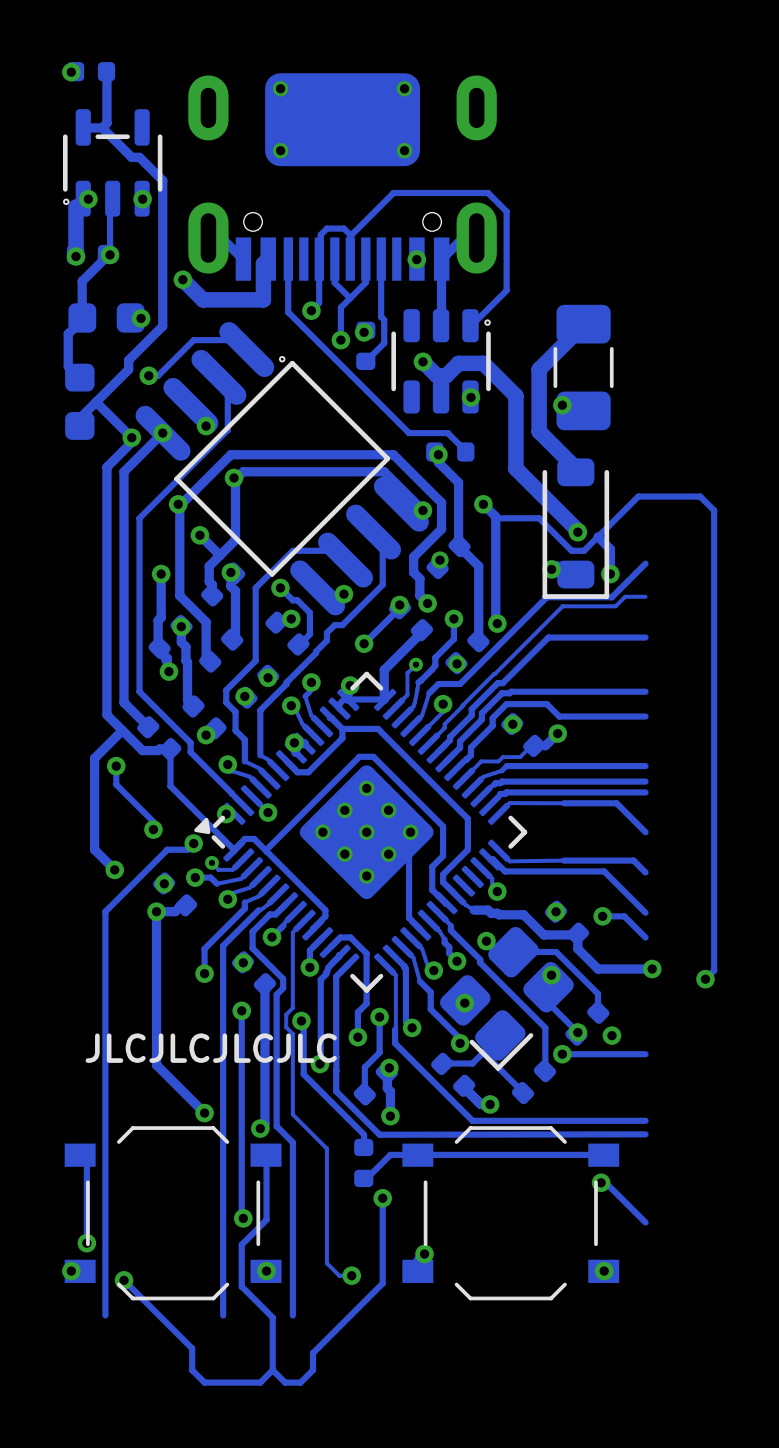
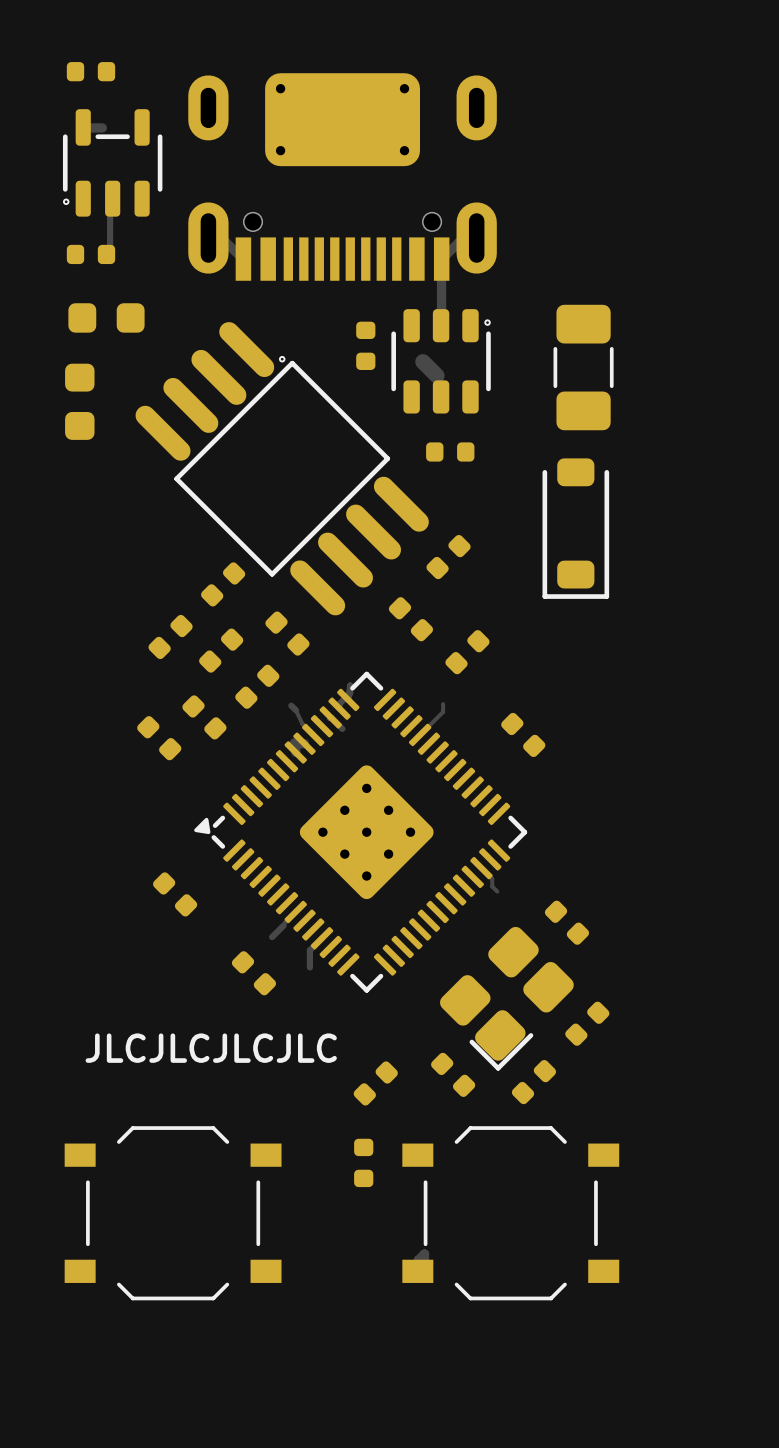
via: (71, 72) -> none
track: (106, 72) (106, 123) (102, 127) (131, 157) (139, 157) (162, 180) (162, 326) (128, 360) (128, 369) (79, 419) (79, 425) -> none
track: (88, 199) (83, 199) (76, 206) (76, 254) -> none
via: (88, 199) -> none
via: (142, 199) -> none
track: (350, 234) (393, 192) (488, 192) (506, 211) (506, 290) (470, 326) -> none
track: (350, 234) (343, 228) (326, 228) (320, 234) (319, 302) (311, 310) -> none
track: (106, 254) (106, 256) (82, 281) (82, 319) (68, 333) (68, 366) (79, 377) -> none
via: (110, 254) -> none
via: (76, 256) -> none
track: (268, 259) (263, 263) (263, 299) (203, 299) (182, 279) -> none
track: (288, 259) (288, 312) (409, 433) (447, 433) (466, 451) -> none
track: (334, 259) (334, 282) (350, 298) -> none
track: (365, 259) (365, 282) (340, 307) (340, 340) -> none
track: (381, 259) (381, 316) (384, 319) (384, 343) (365, 361) -> none
via: (416, 259) -> none
via: (182, 279) -> none
via: (311, 310) -> none
via: (141, 318) -> none
track: (584, 324) (539, 369) (539, 431) (576, 468) (576, 471) -> none
via: (364, 332) -> none
via: (340, 340) -> none
track: (246, 349) (237, 340) (193, 340) (157, 375) -> none
via: (422, 361) -> none
via: (148, 375) -> none
track: (218, 377) (227, 386) (227, 429) (139, 518) (139, 691) (190, 742) (190, 752) (232, 793) -> none
track: (441, 397) (436, 392) (436, 375) (446, 375) (458, 363) (483, 363) (515, 395) (515, 468) (577, 530) -> none
via: (470, 397) -> none
track: (96, 402) (131, 437) (131, 442) (106, 467) (106, 714) (142, 750) (170, 749) (170, 786) (234, 849) -> none
via: (562, 405) -> none
via: (206, 426) -> none
track: (162, 433) (124, 471) (124, 702) (148, 727) -> none
via: (162, 433) -> none
via: (131, 437) -> none
track: (434, 452) (438, 454) (438, 462) (458, 482) (458, 544) (460, 546) -> none
via: (438, 454) -> none
via: (234, 477) -> none
track: (235, 479) (243, 471) (384, 471) (422, 510) -> none
track: (235, 479) (235, 539) (209, 566) (209, 581) (212, 584) (212, 595) -> none
via: (178, 504) -> none
track: (179, 504) (179, 595) (206, 622) (206, 657) (210, 661) -> none
track: (181, 504) (230, 454) (393, 454) (441, 502) (441, 529) (413, 556) (413, 572) (419, 578) (419, 595) (427, 603) -> none
track: (483, 504) (495, 516) (495, 622) -> none
via: (483, 504) -> none
via: (422, 510) -> none
track: (495, 518) (539, 518) (571, 550) (584, 550) (638, 496) (700, 496) (714, 510) (714, 970) (705, 979) -> none
track: (373, 532) (382, 541) (382, 584) (342, 625) (334, 625) (326, 632) (326, 640) (260, 710) (260, 755) (278, 770) -> none
via: (577, 532) -> none
track: (199, 535) (220, 555) -> none
via: (199, 535) -> none
track: (598, 536) (610, 549) (610, 574) -> none
track: (460, 546) (478, 566) (478, 641) -> none
track: (345, 560) (336, 550) (292, 550) (255, 587) (255, 660) (226, 690) (226, 702) (235, 711) (235, 730) (244, 739) (244, 761) (258, 768) (269, 778) -> none
via: (440, 560) -> none
track: (645, 563) (611, 597) (546, 597) (460, 684) (438, 684) (429, 693) (422, 715) (411, 726) -> none
via: (551, 569) -> none
track: (230, 572) (230, 586) (235, 591) (235, 635) (232, 639) -> none
via: (230, 572) -> none
track: (161, 574) (161, 617) (158, 620) (158, 646) (159, 648) (168, 657) (168, 671) (159, 647) -> none
via: (161, 574) -> none
via: (610, 574) -> none
track: (280, 587) (309, 612) (309, 634) (298, 644) -> none
via: (280, 587) -> none
via: (343, 594) -> none
track: (645, 596) (625, 596) (615, 606) (562, 606) (462, 705) (428, 743) -> none
via: (427, 603) -> none
track: (399, 605) (399, 608) (364, 643) -> none
via: (399, 605) -> none
via: (291, 618) -> none
track: (453, 618) (453, 639) (435, 657) (435, 665) (418, 682) (413, 706) (402, 717) -> none
via: (453, 618) -> none
via: (497, 623) -> none
track: (181, 626) (181, 642) (185, 646) (187, 662) (187, 701) (193, 706) -> none
via: (181, 626) -> none
track: (421, 629) (421, 632) (384, 670) (384, 699) -> none
track: (645, 637) (548, 637) (502, 683) (497, 683) (471, 709) (471, 715) (437, 751) -> none
via: (364, 643) -> none
via: (457, 663) -> none
track: (416, 664) (407, 673) (407, 694) (393, 708) -> none
via: (416, 664) -> none
via: (168, 671) -> none
via: (268, 677) -> none
via: (311, 682) -> none
via: (350, 685) -> none
track: (309, 691) (305, 696) (311, 715) (322, 726) -> none
track: (645, 691) (501, 693) (481, 713) (481, 719) (460, 741) (460, 747) (446, 761) -> none
track: (347, 695) (348, 699) (385, 699) -> none
via: (244, 696) -> none
via: (443, 704) -> none
via: (291, 705) -> none
track: (645, 716) (559, 716) (546, 704) (506, 704) (492, 718) (492, 725) (470, 747) (470, 755) (455, 770) -> none
via: (512, 724) -> none
track: (122, 730) (94, 758) (94, 849) (114, 869) -> none
track: (557, 733) (545, 745) -> none
via: (557, 733) -> none
via: (206, 735) -> none
via: (294, 742) -> none
track: (534, 745) (531, 745) (520, 757) (502, 757) (498, 761) (481, 761) (463, 778) -> none
track: (286, 761) (297, 772) (308, 772) (342, 738) (342, 728) (378, 728) (467, 818) (467, 849) (443, 874) (443, 882) (455, 894) -> none
via: (227, 764) -> none
track: (116, 766) (116, 784) (153, 821) (153, 829) -> none
via: (116, 766) -> none
track: (645, 766) (506, 766) (501, 770) (483, 776) (472, 787) -> none
track: (230, 767) (230, 770) (249, 776) (260, 787) -> none
track: (645, 781) (501, 781) (492, 785) (481, 796) -> none
track: (645, 792) (506, 792) (500, 793) (490, 805) -> none
via: (268, 812) -> none
track: (499, 813) (509, 803) (616, 803) (645, 832) -> none
via: (226, 814) -> none
via: (153, 829) -> none
track: (410, 832) (409, 834) (409, 917) (420, 929) -> none
track: (193, 843) (187, 849) (167, 849) (105, 911) (105, 1315) -> none
via: (193, 843) -> none
track: (234, 849) (244, 838) (254, 838) (325, 910) (325, 916) (313, 929) -> none
track: (499, 850) (509, 861) (633, 860) (645, 872) -> none
track: (266, 851) (359, 756) (373, 756) (443, 826) (443, 855) (432, 866) (432, 890) (446, 903) -> none
track: (490, 859) (493, 859) (505, 871) (604, 871) (645, 912) -> none
via: (211, 862) -> none
track: (212, 863) (218, 869) (233, 869) -> none
track: (251, 868) (241, 878) (216, 883) (210, 877) (195, 877) -> none
via: (114, 869) -> none
track: (260, 876) (249, 887) (227, 894) -> none
via: (195, 877) -> none
via: (164, 883) -> none
track: (269, 885) (258, 896) (244, 902) (244, 908) (204, 948) (204, 973) -> none
via: (497, 891) -> none
track: (278, 894) (267, 905) (258, 910) (223, 945) (223, 1315) -> none
track: (455, 894) (474, 910) (488, 910) (491, 913) (498, 914) (523, 914) (543, 934) (576, 934) -> none
via: (227, 899) -> none
track: (286, 903) (275, 914) (269, 914) (252, 931) (252, 948) (283, 978) (283, 988) (276, 994) (276, 1126) (292, 1142) (292, 1315) -> none
track: (185, 905) (181, 905) (175, 911) (156, 911) (156, 1065) (204, 1113) -> none
via: (156, 911) -> none
track: (437, 911) (450, 925) (450, 930) (480, 959) (480, 962) (545, 1027) (545, 1071) -> none
via: (556, 911) -> none
track: (602, 916) (624, 916) (645, 937) -> none
via: (602, 916) -> none
track: (304, 920) (292, 932) (292, 1008) (286, 1014) (286, 1027) (292, 1033) (292, 1114) (326, 1148) (326, 1263) (339, 1275) (351, 1275) -> none
track: (428, 920) (439, 931) (444, 942) (449, 947) (449, 953) (457, 961) -> none
track: (576, 934) (577, 948) (598, 969) (652, 969) -> none
via: (272, 937) -> none
track: (411, 938) (422, 948) (429, 970) -> none
track: (486, 941) (497, 951) (556, 951) (598, 993) (598, 1012) -> none
via: (486, 941) -> none
track: (330, 947) (340, 937) (350, 937) (366, 953) (366, 1003) (357, 1012) (357, 1040) -> none
track: (402, 947) (413, 957) (419, 981) (430, 992) (430, 1009) (460, 1038) (460, 1043) -> none
track: (339, 955) (320, 979) (320, 1063) -> none
track: (393, 955) (405, 969) (405, 1021) (412, 1027) -> none
via: (457, 961) -> none
via: (243, 962) -> none
track: (348, 964) (336, 976) (336, 1091) (379, 1134) (645, 1134) -> none
track: (385, 964) (395, 975) (395, 1043) (472, 1120) (645, 1120) -> none
via: (309, 967) -> none
via: (652, 969) -> none
via: (433, 970) -> none
via: (204, 973) -> none
via: (551, 975) -> none
via: (705, 979) -> none
track: (264, 984) (264, 1123) (260, 1128) -> none
track: (548, 987) (548, 1003) (577, 1032) -> none
via: (464, 1003) -> none
track: (241, 1010) (241, 1216) -> none
via: (241, 1010) -> none
track: (379, 1017) (379, 1052) (364, 1067) (364, 1094) -> none
via: (379, 1017) -> none
track: (301, 1020) (303, 1023) (303, 1074) (364, 1134) (364, 1147) -> none
via: (301, 1020) -> none
via: (412, 1027) -> none
via: (577, 1032) -> none
track: (500, 1035) (472, 1063) (442, 1063) -> none
via: (611, 1035) -> none
via: (357, 1037) -> none
via: (460, 1043) -> none
track: (483, 1052) (523, 1093) -> none
via: (562, 1054) -> none
track: (645, 1054) (562, 1054) -> none
via: (320, 1063) -> none
via: (389, 1067) -> none
track: (387, 1072) (387, 1088) (390, 1091) (390, 1116) -> none
track: (464, 1085) (480, 1104) (490, 1104) -> none
via: (490, 1104) -> none
via: (204, 1113) -> none
via: (390, 1116) -> none
via: (260, 1128) -> none
track: (80, 1154) (86, 1161) (86, 1243) -> none
track: (266, 1154) (266, 1219) (241, 1244) (241, 1286) (272, 1317) (272, 1370) -> none
track: (604, 1154) (390, 1154) (367, 1178) (364, 1178) -> none
via: (601, 1182) -> none
track: (605, 1182) (645, 1222) -> none
track: (382, 1198) (382, 1283) (312, 1353) (312, 1370) (300, 1382) (285, 1382) (272, 1370) -> none
via: (382, 1198) -> none
via: (243, 1218) -> none
via: (86, 1243) -> none
via: (424, 1254) -> none
via: (71, 1271) -> none
via: (266, 1271) -> none
via: (604, 1271) -> none
via: (351, 1275) -> none
track: (124, 1280) (192, 1348) (192, 1370) (204, 1382) (260, 1382) (272, 1370) -> none
via: (124, 1280) -> none

